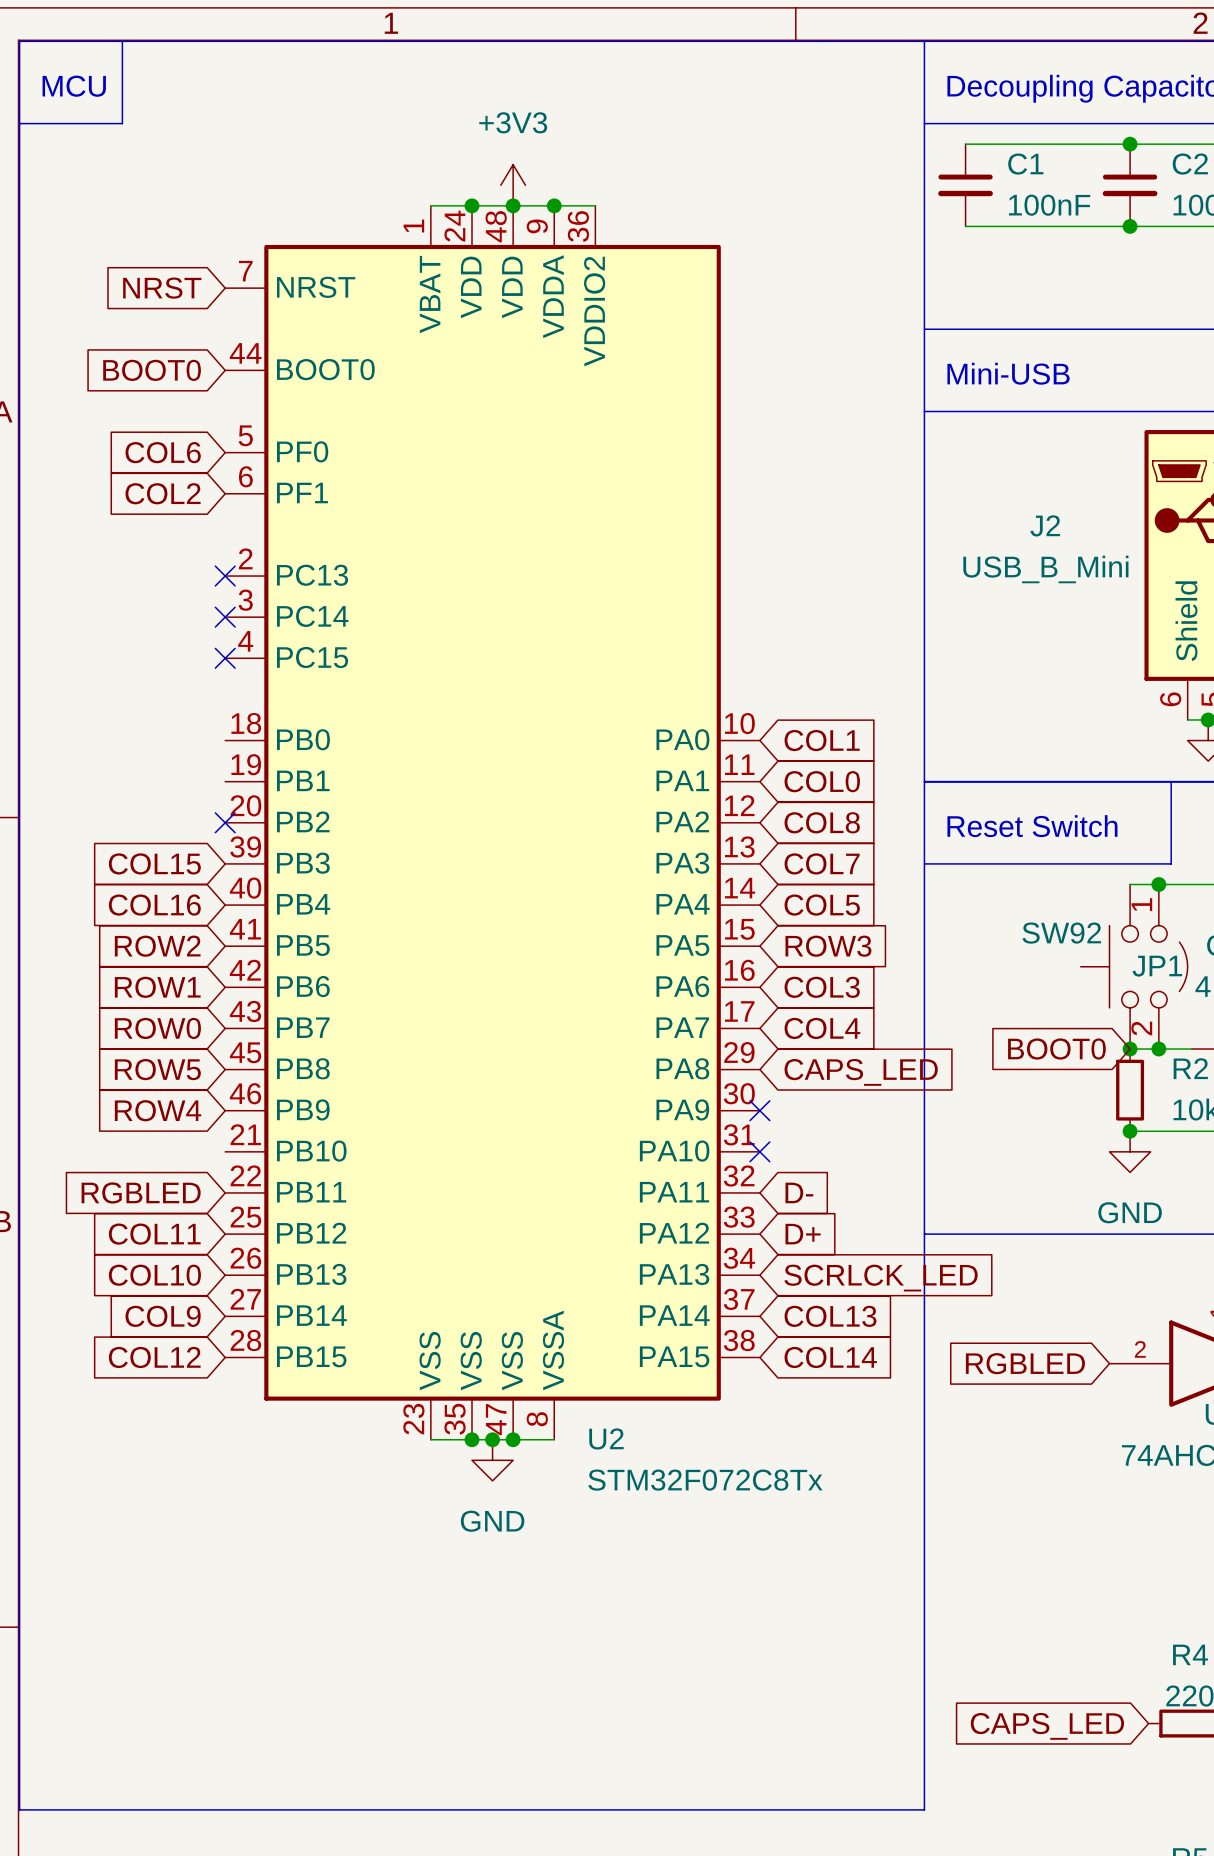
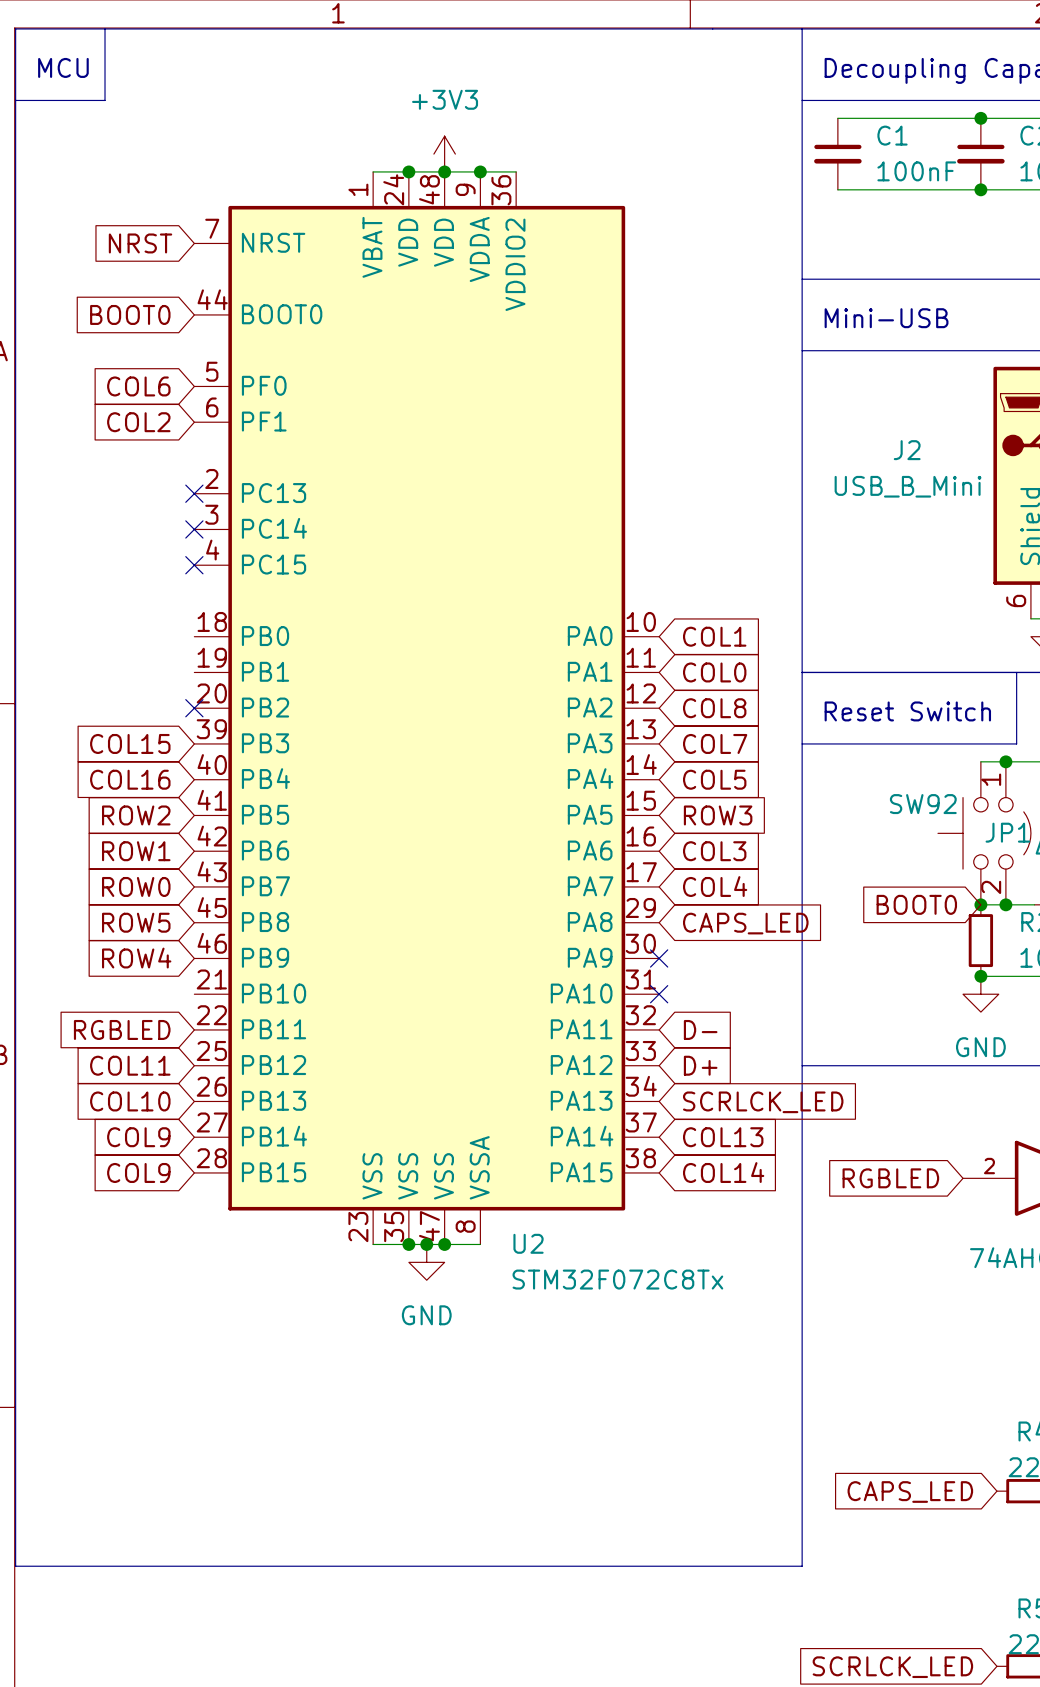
global label: COL12 (154, 1357) -> COL9 (138, 1172)

